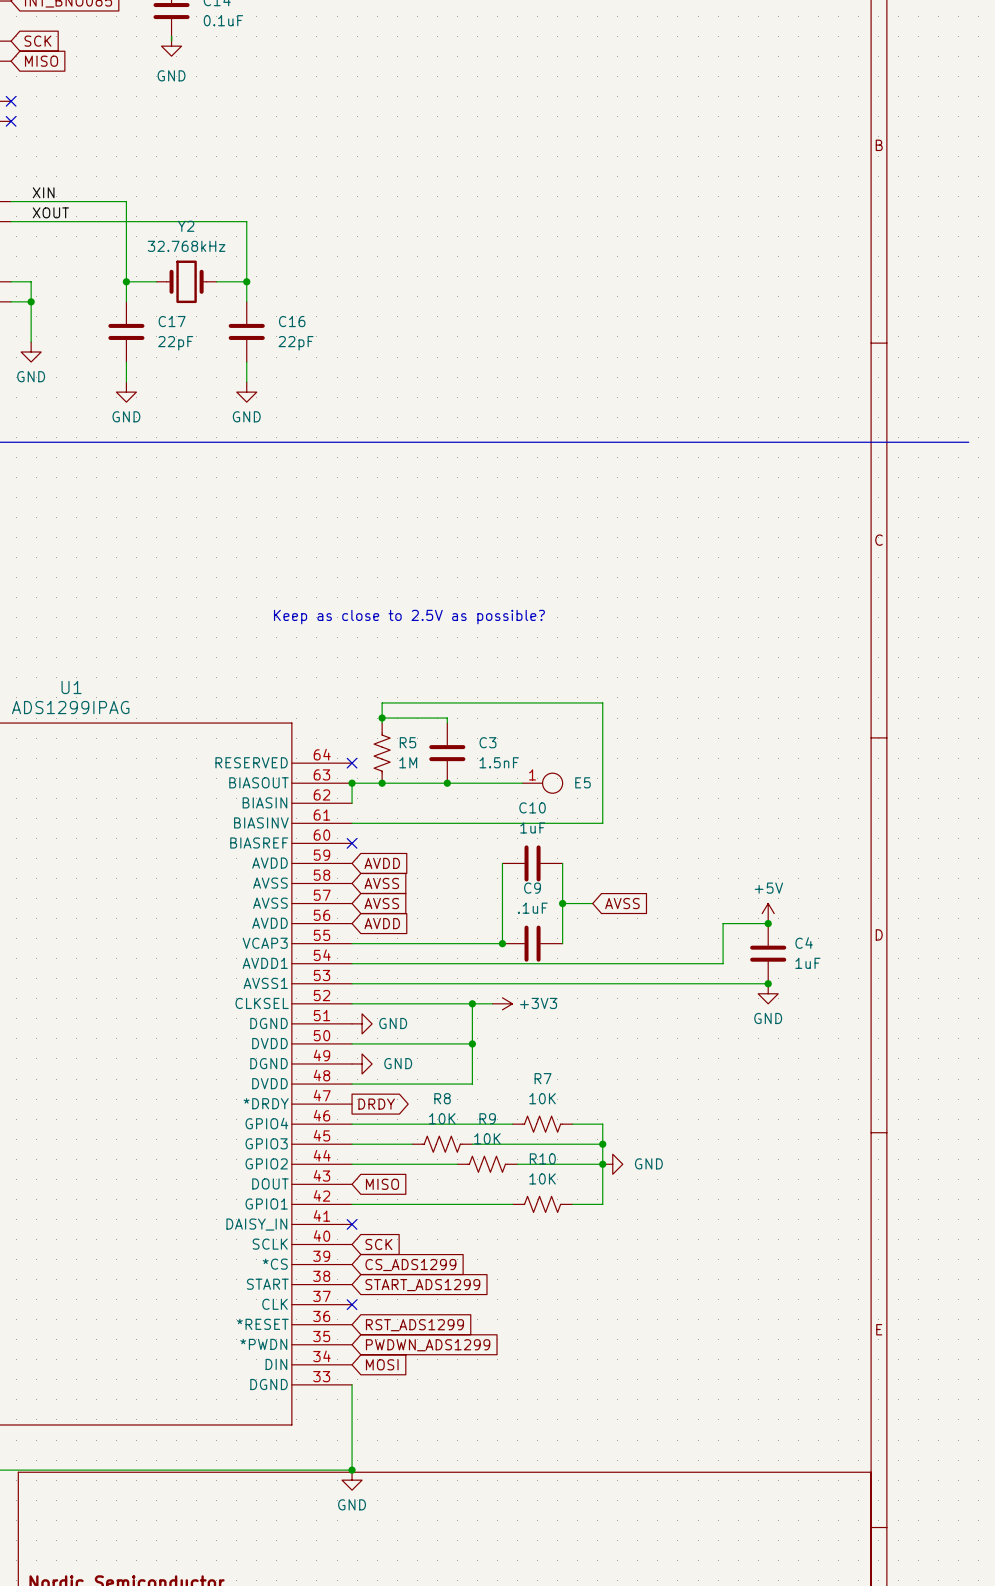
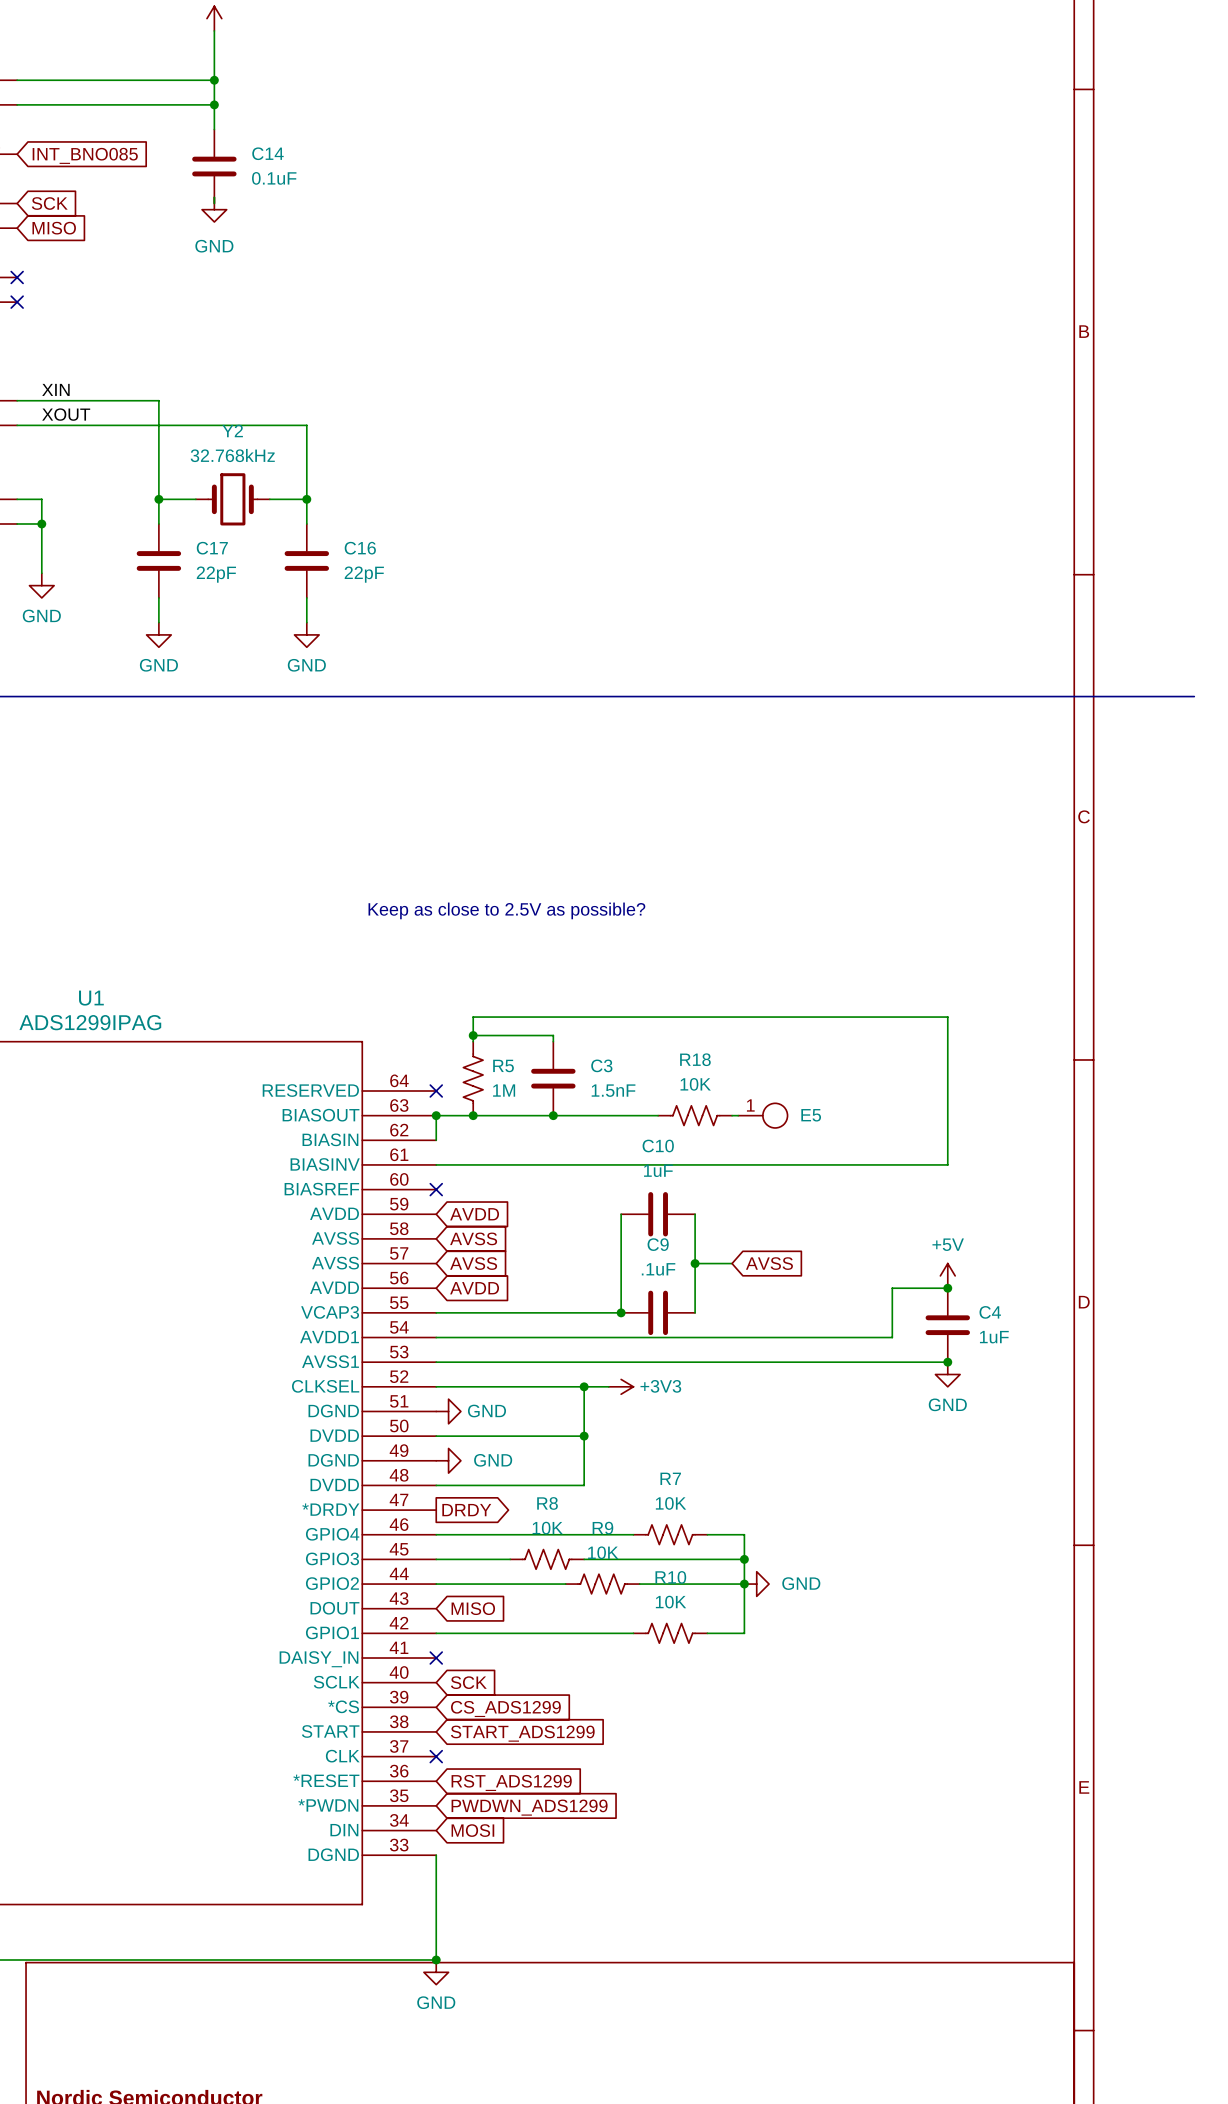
wire: (602, 702) (602, 823) -> (744, 1017) (947, 1017) (947, 1164) (744, 1164)
E5 position: (542, 783) -> (762, 1115)
R18: none -> 10K (695, 1115)
wire: none -> (732, 1115) (738, 1115)

